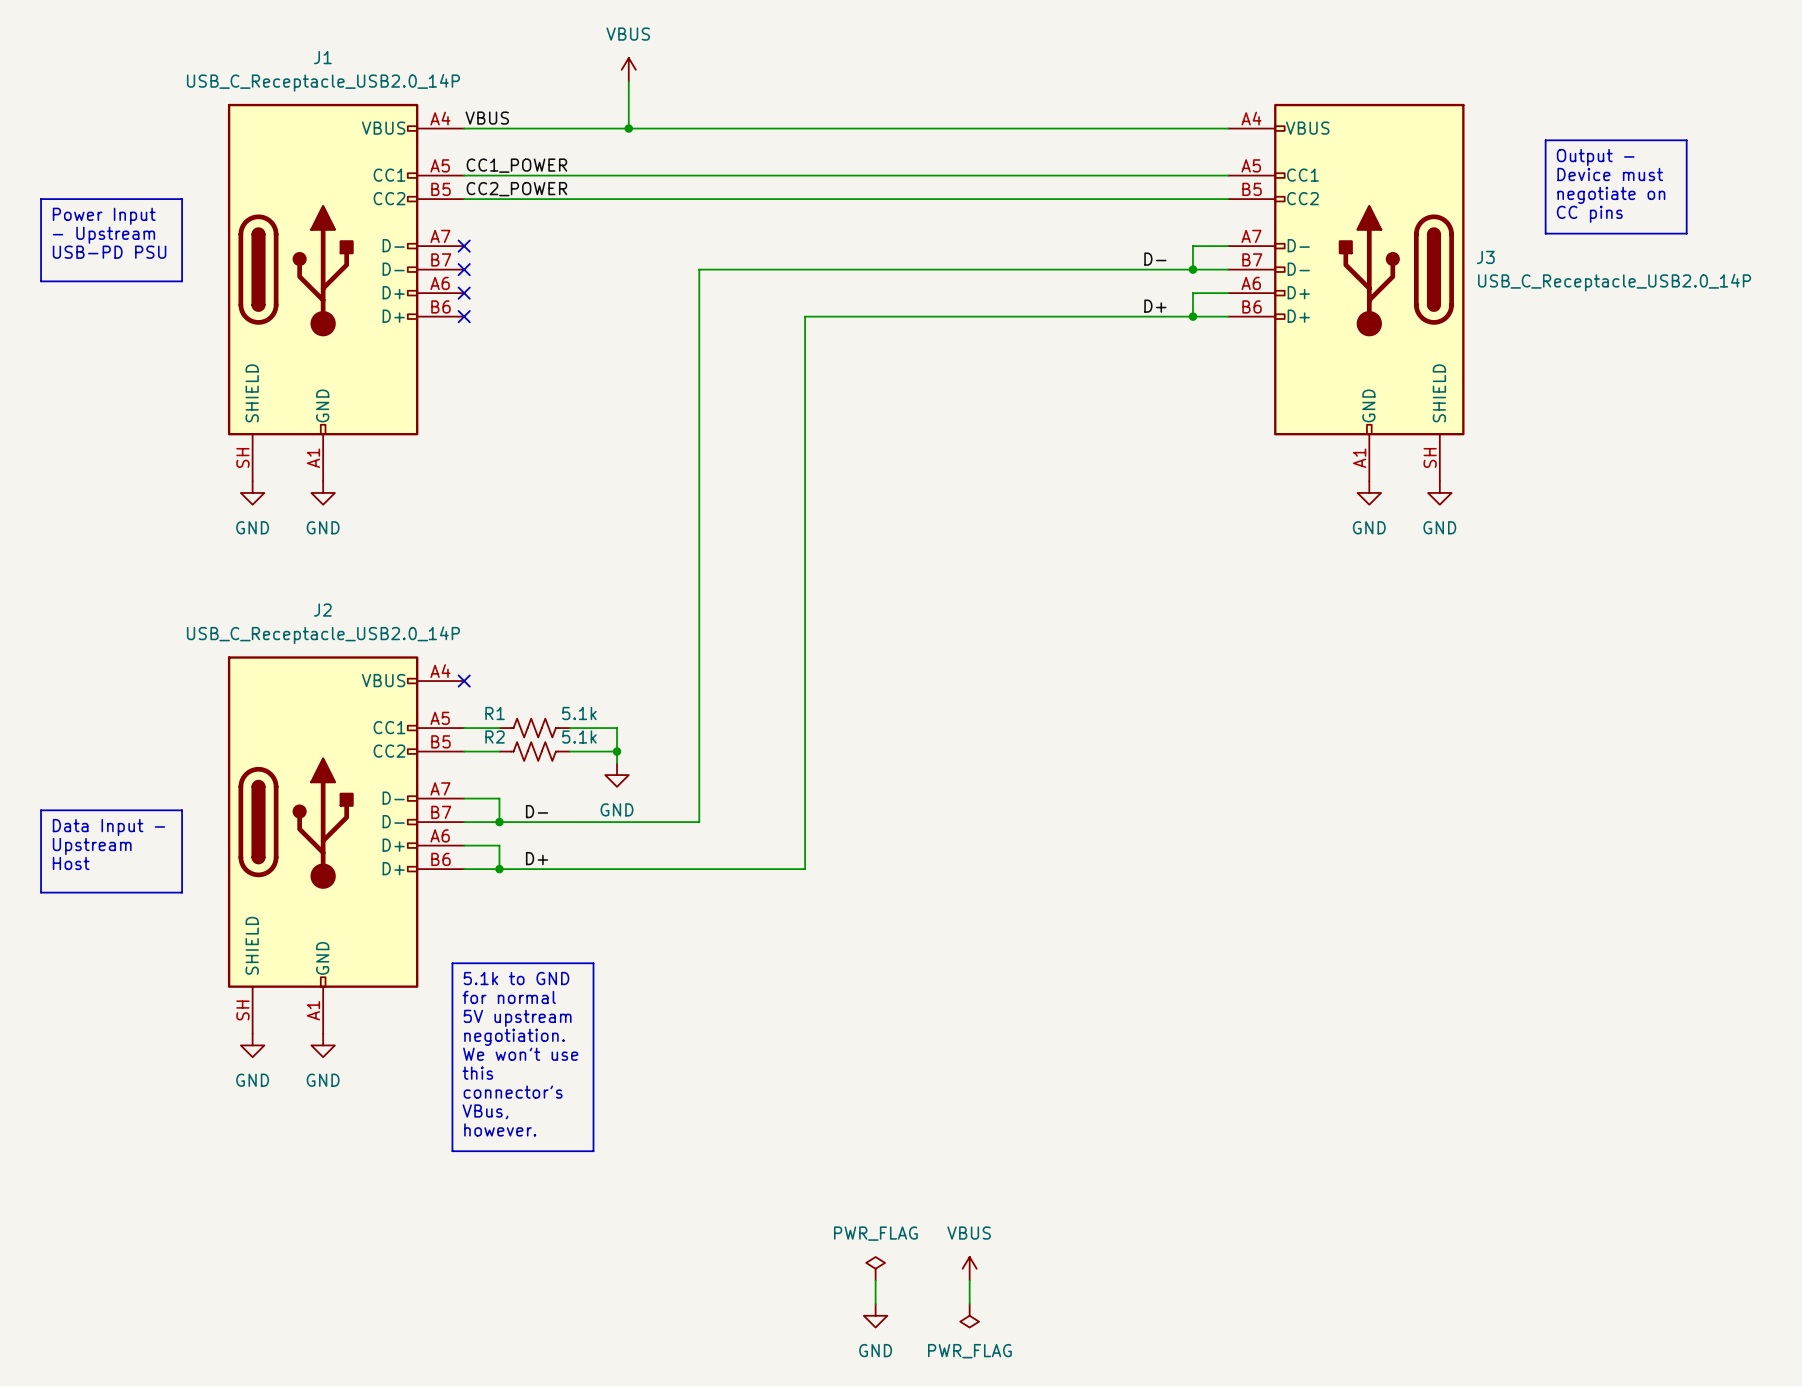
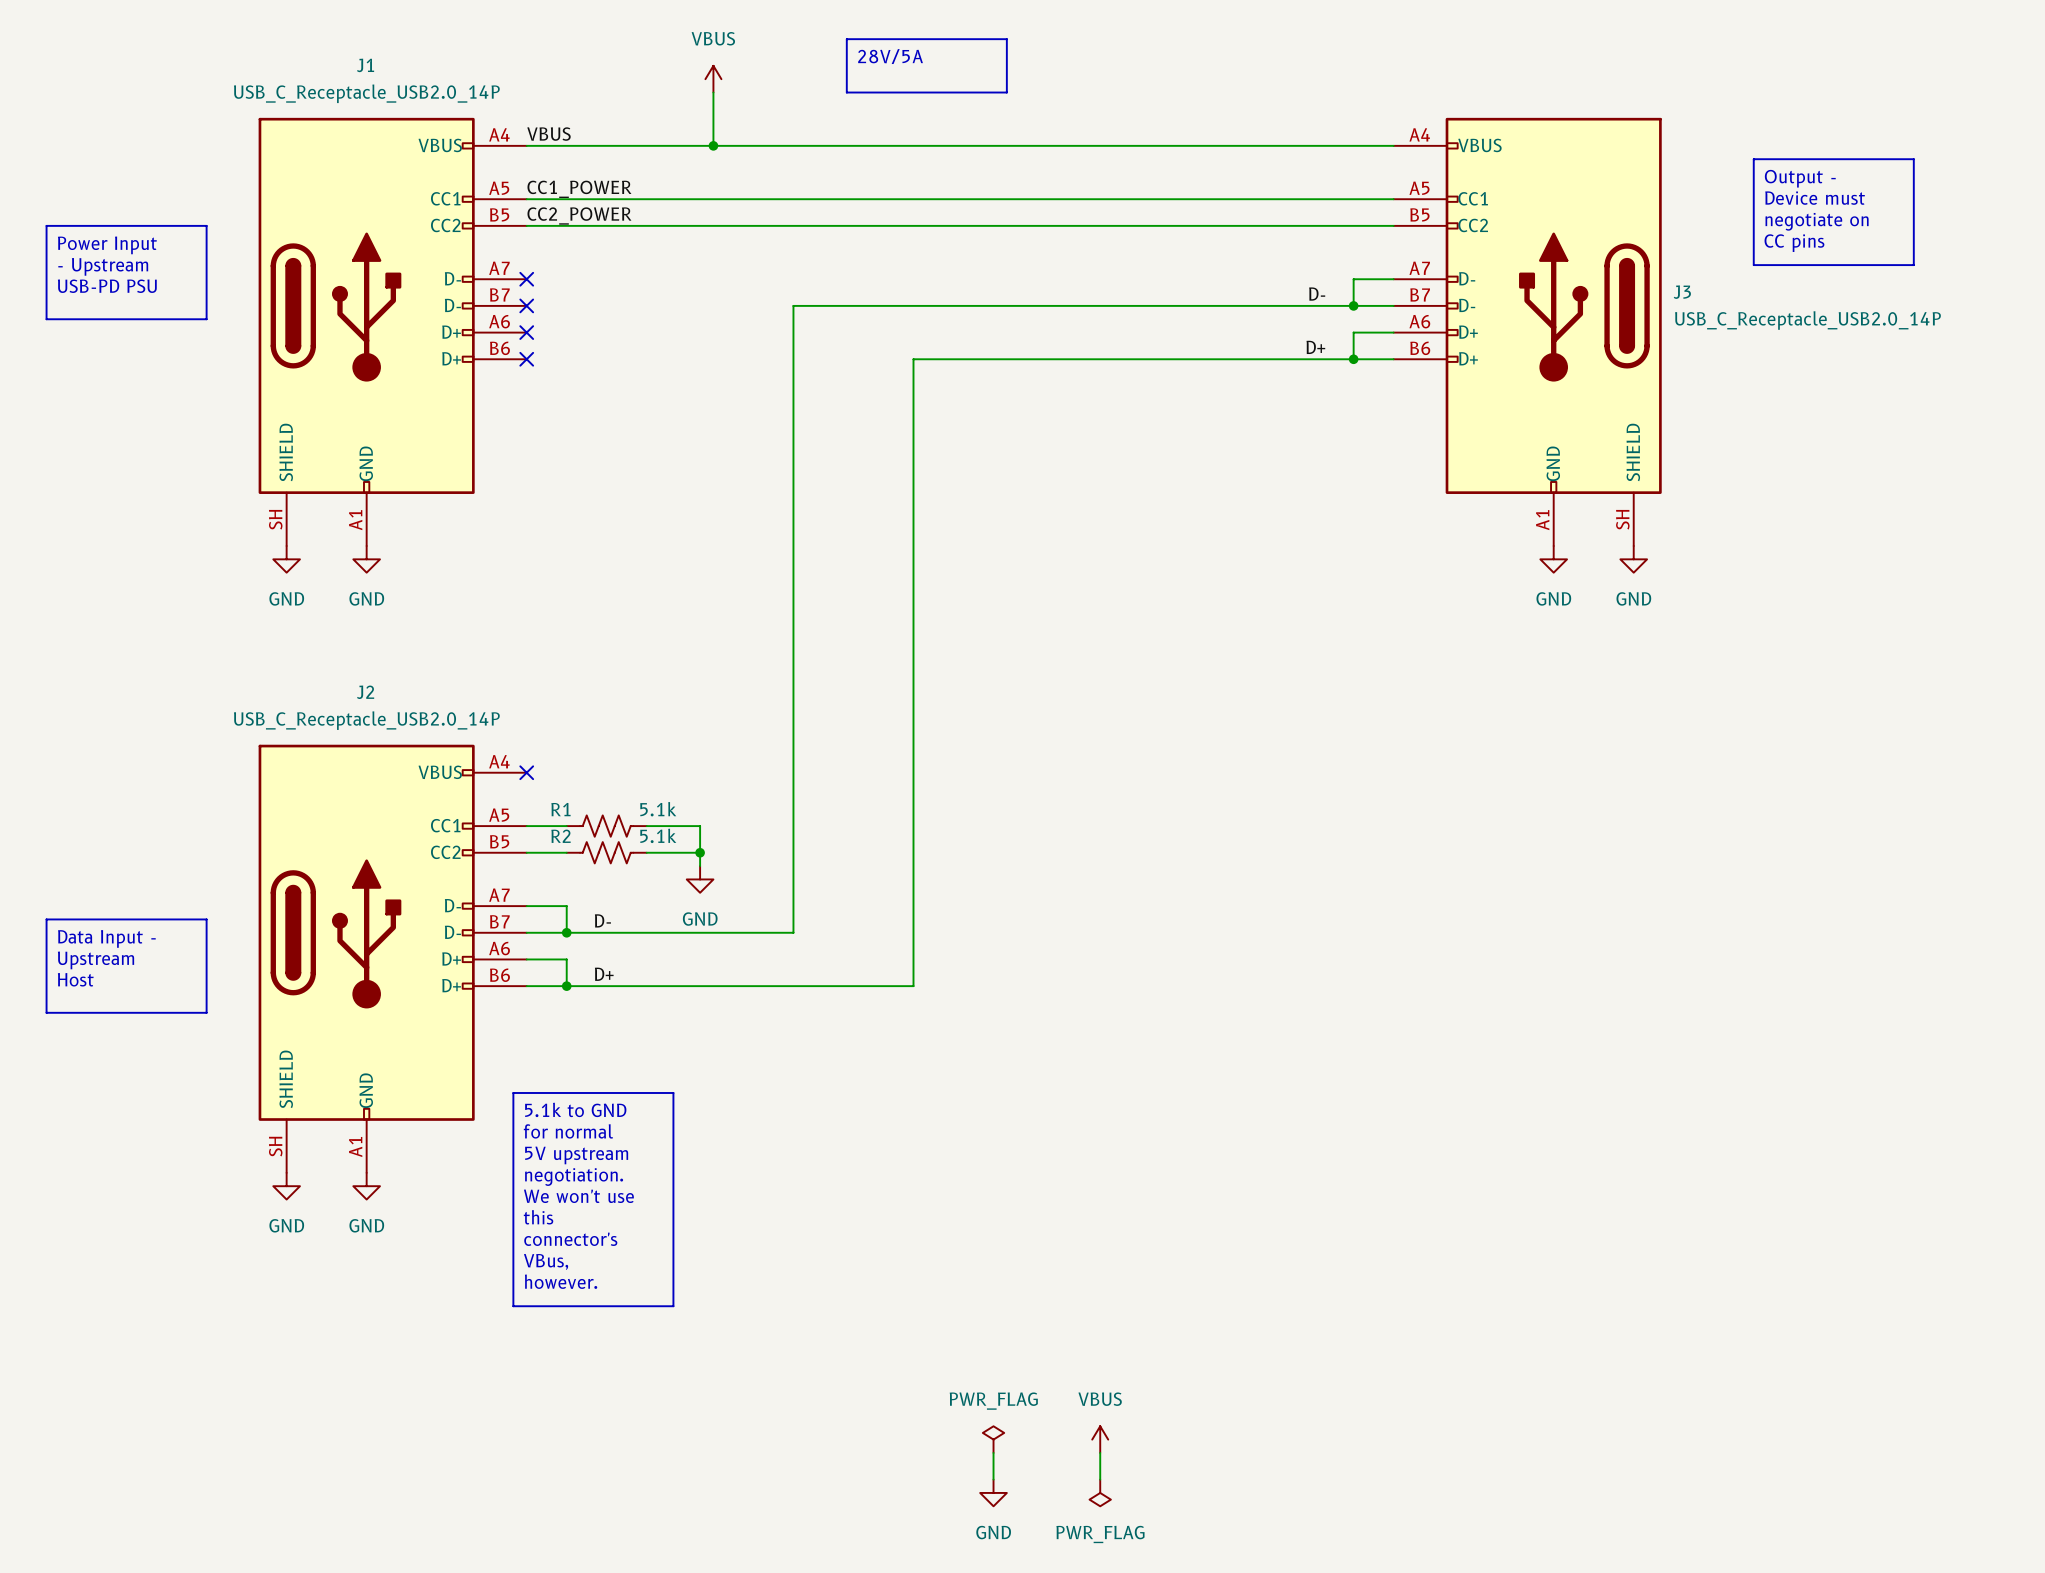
line: none -> (846, 39) (1006, 39) (1006, 92) (846, 92) (846, 39)
text: none -> 28V/5A (890, 56)

